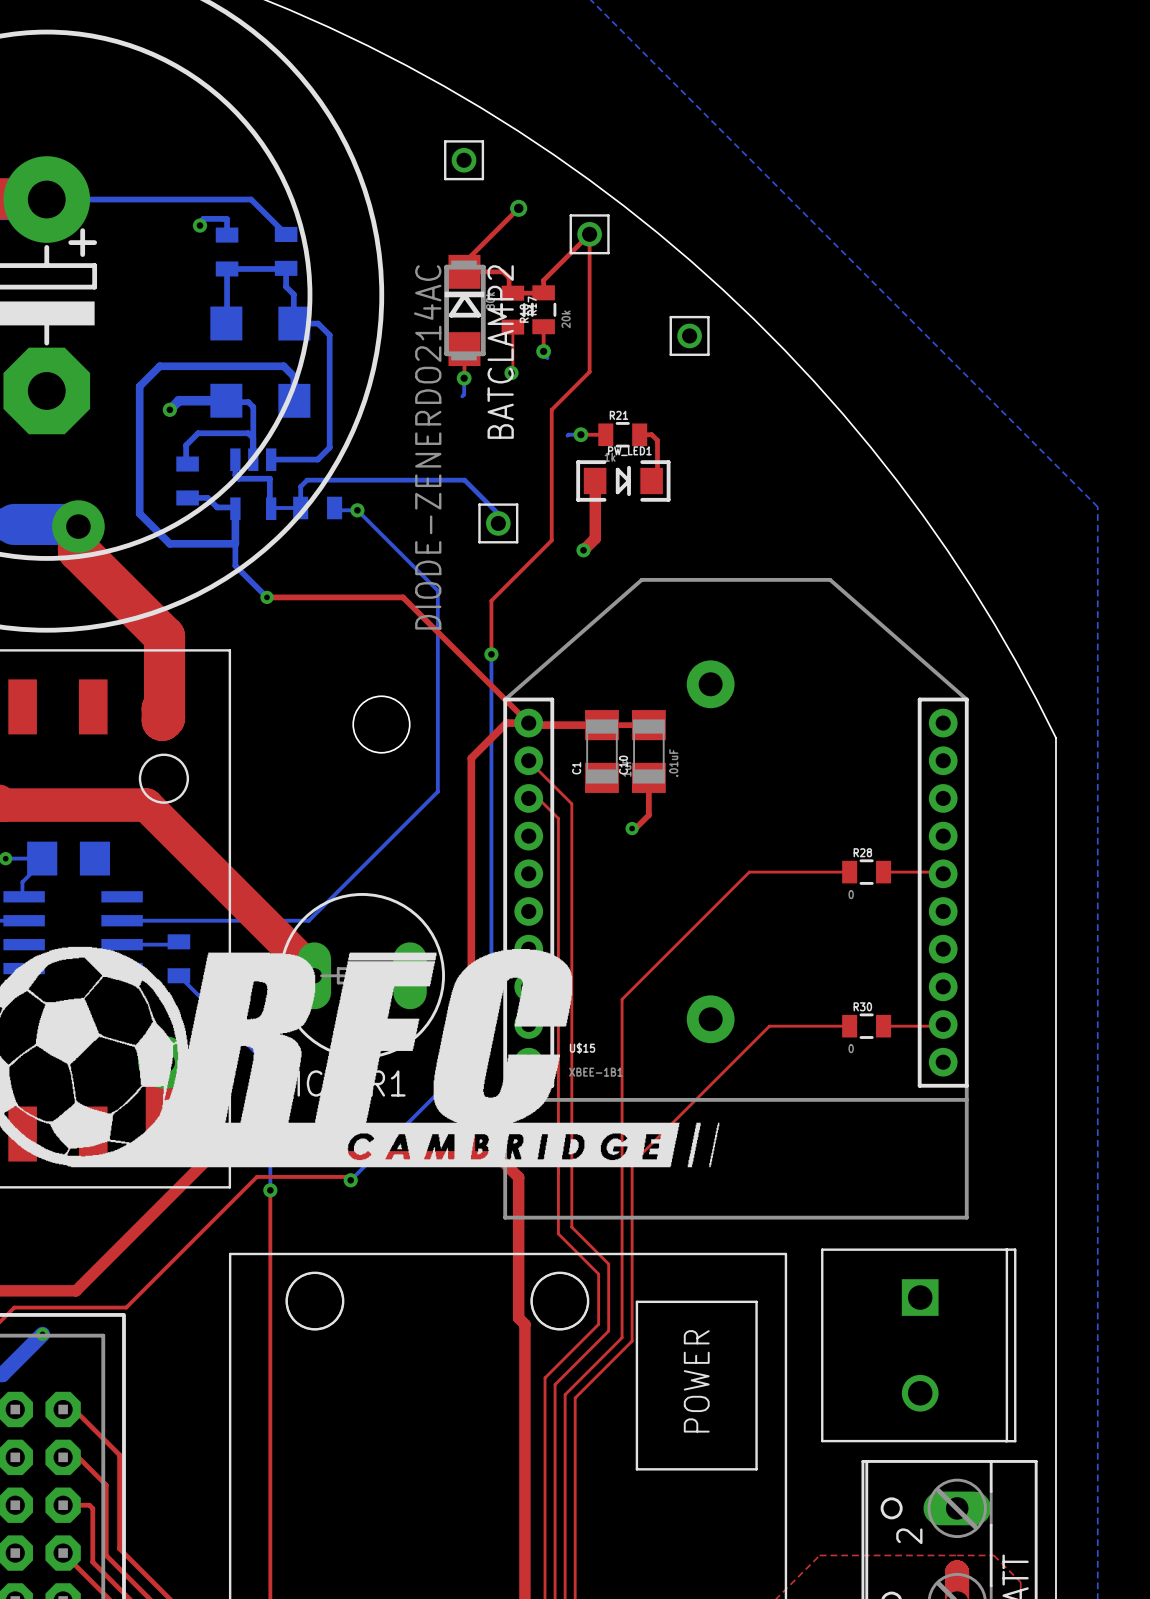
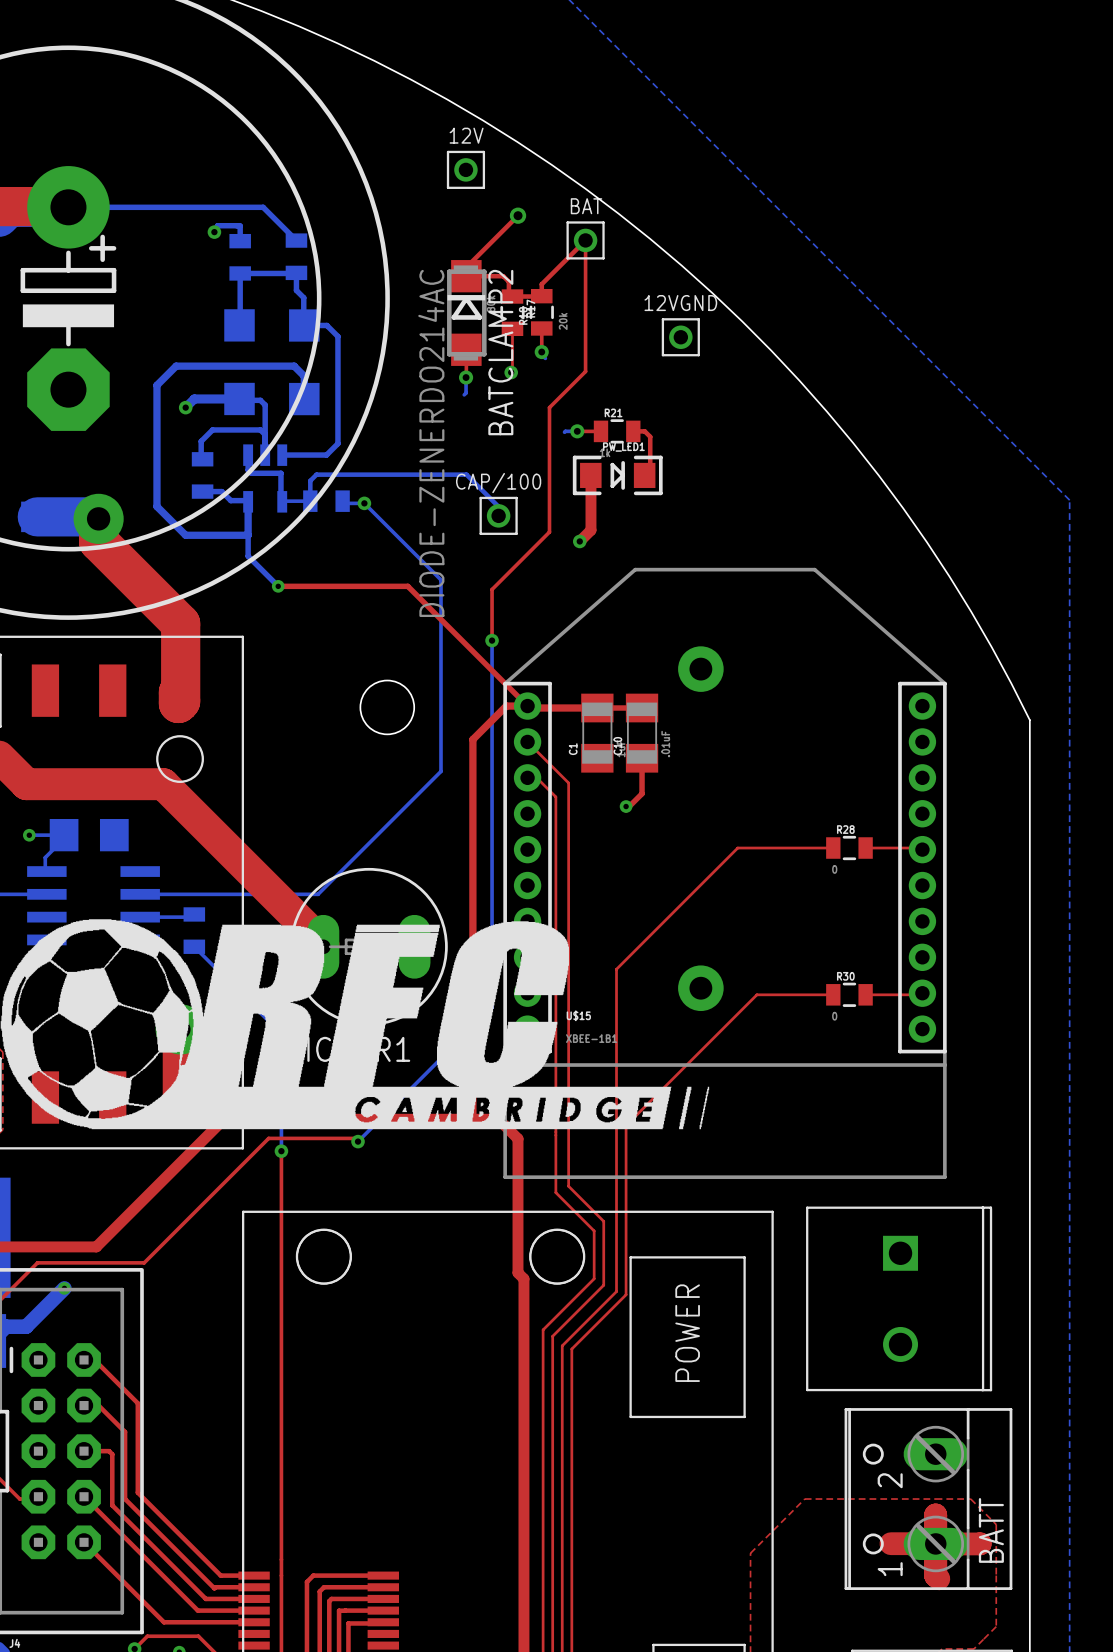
12V name: none -> 12V (466, 135)
BAT name: none -> BAT (586, 206)
12VGND name: none -> 12VGND (680, 303)
CAP/100 name: none -> CAP/100 (498, 483)

